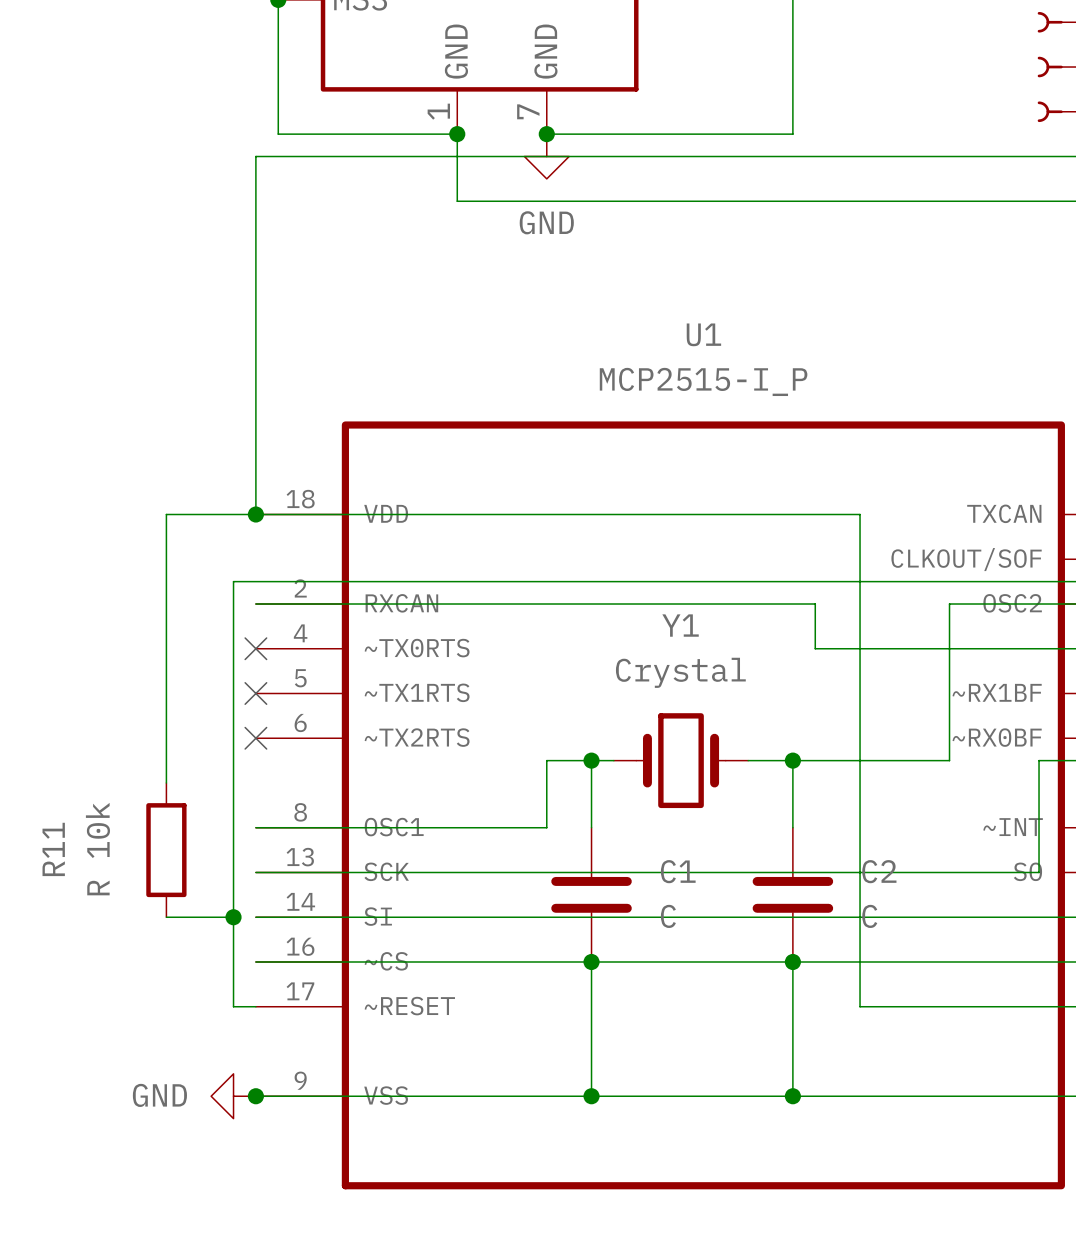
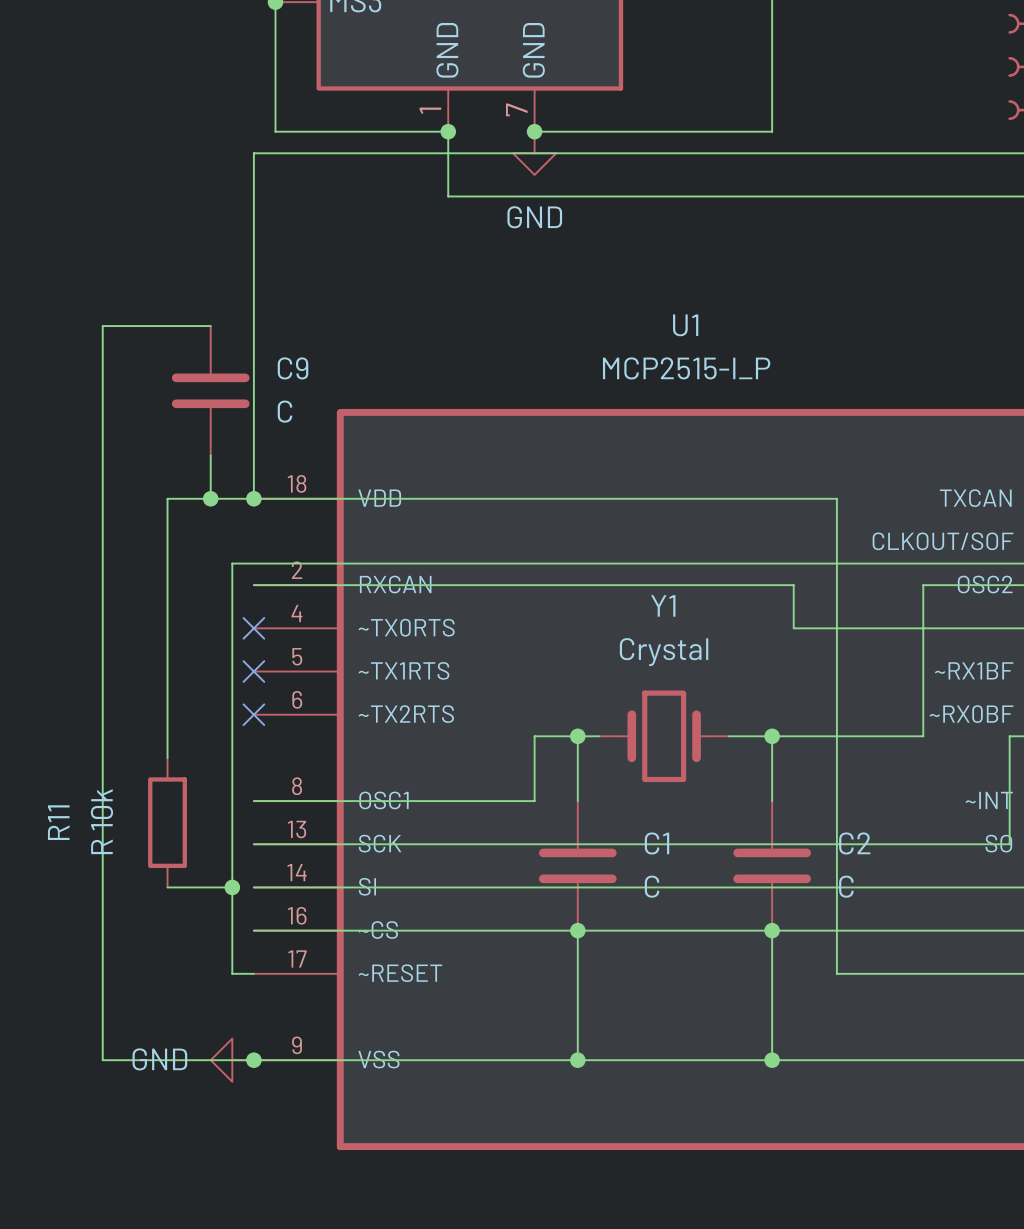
wire: none -> (210, 326) (102, 326) (102, 1060) (253, 1060)
C9: none -> C (210, 390)
wire: none -> (210, 455) (210, 498)
junction: none -> (210, 498)

